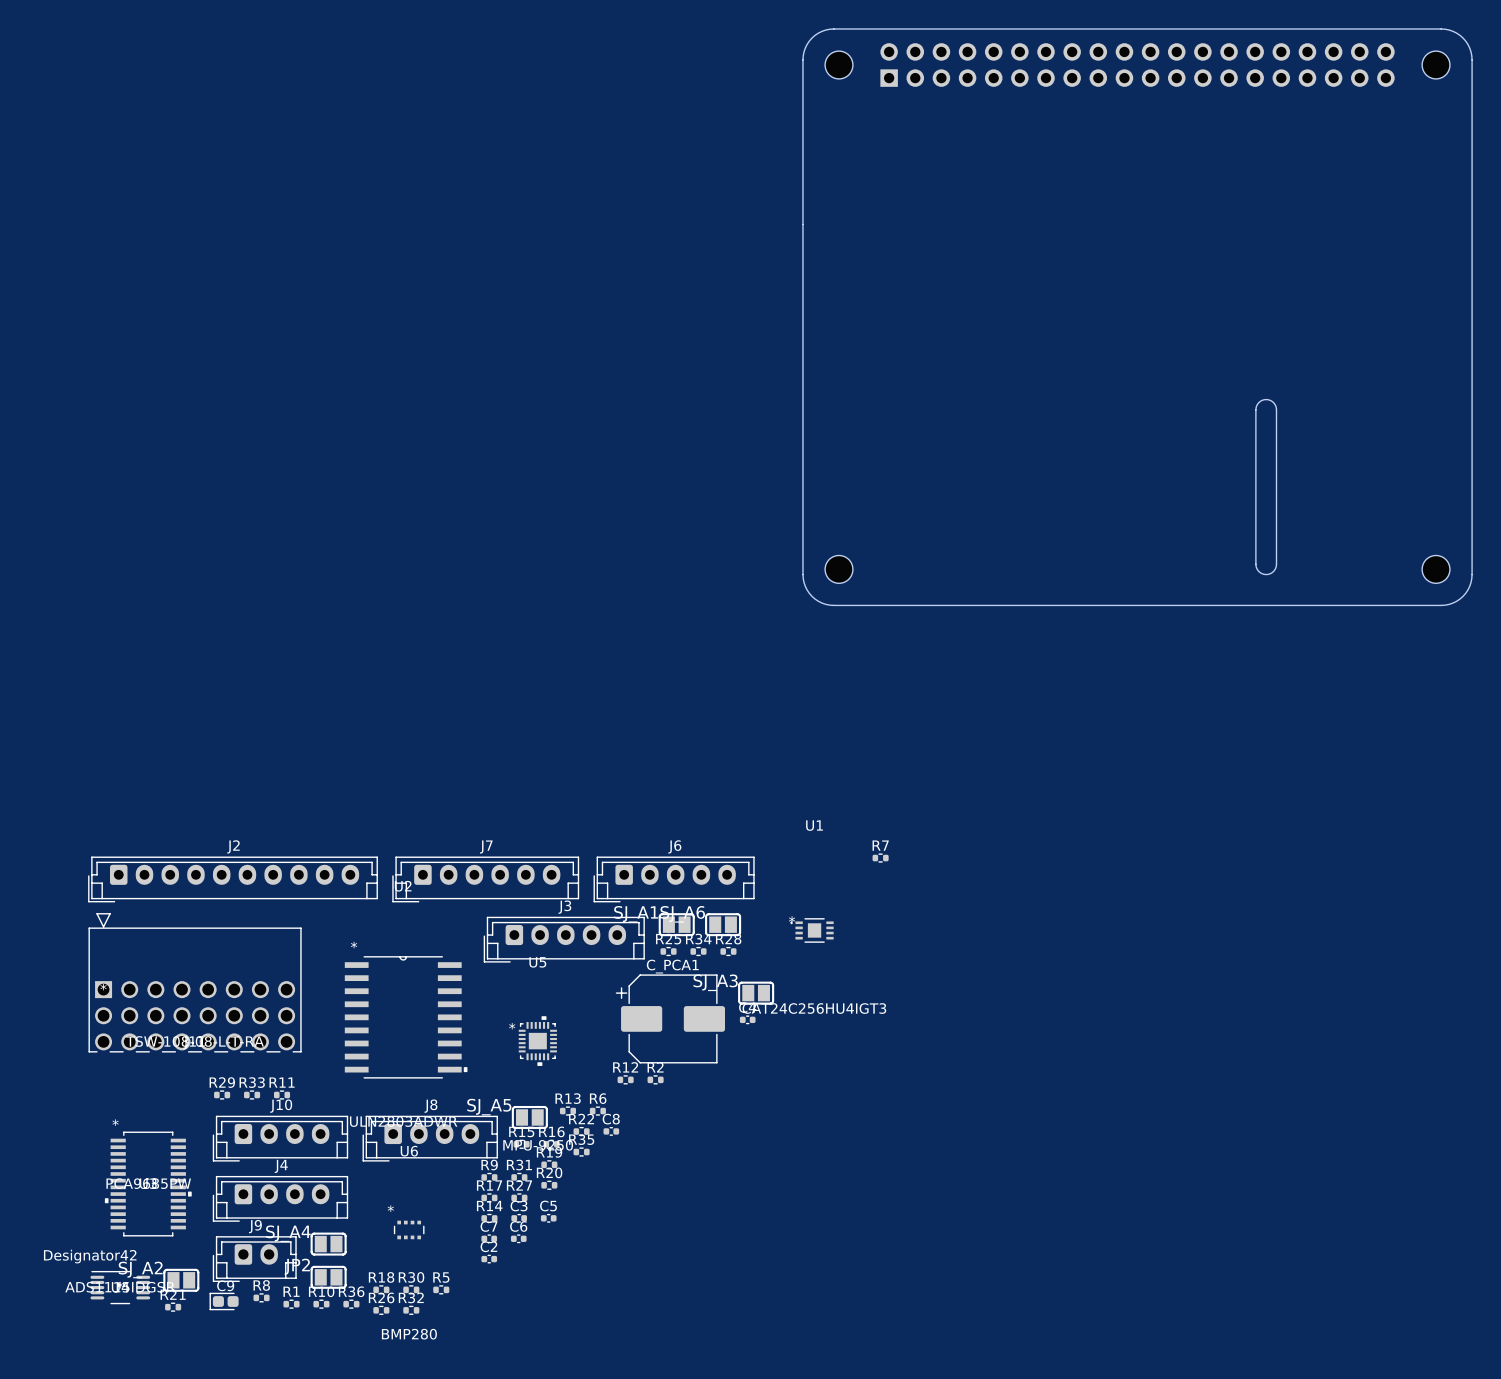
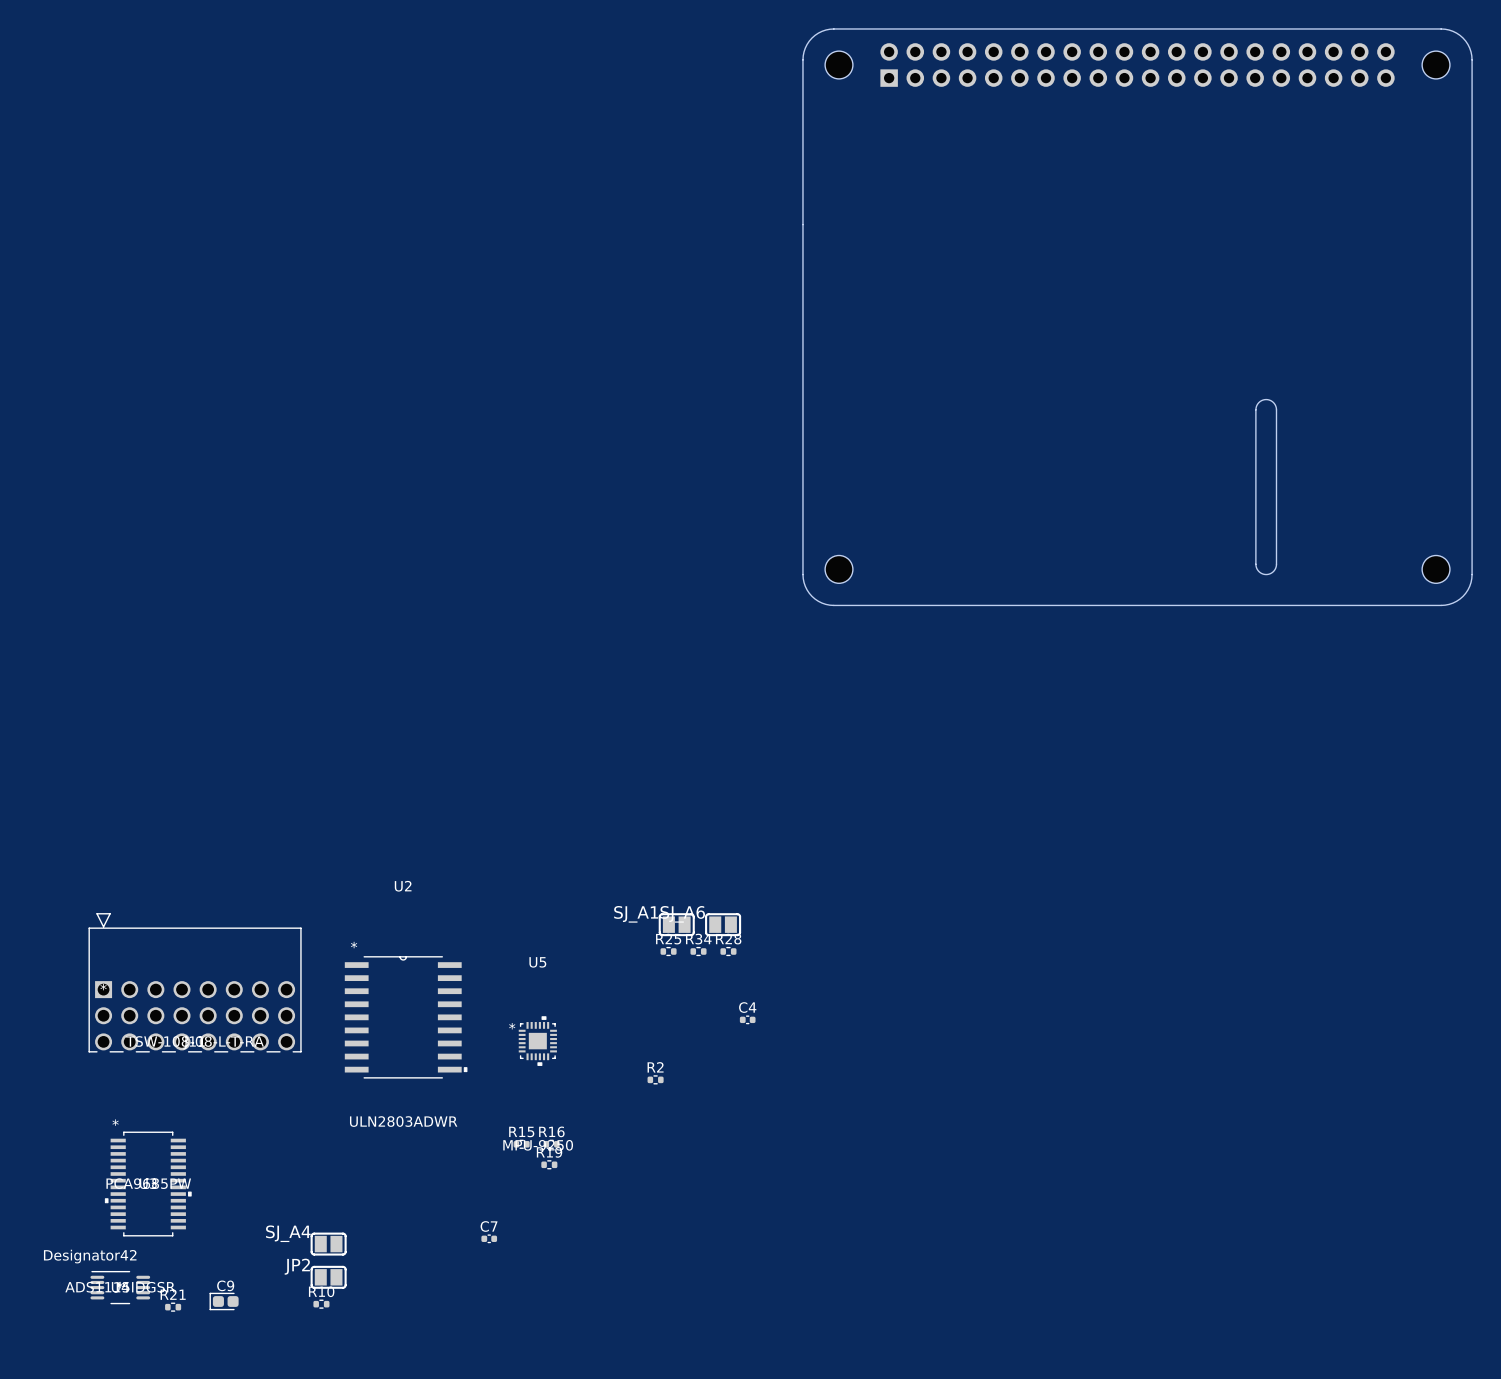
R7: (880, 858) -> none
J2: (233, 879) -> none
J7: (485, 879) -> none
J6: (674, 879) -> none
U1: CAT24C256HU4IGT3 (812, 930) -> none
J3: (564, 939) -> none
SJ_A3: (756, 993) -> none
C_PCA1: (670, 1018) -> none
R12: (625, 1079) -> none
R29: (222, 1095) -> none
R33: (252, 1095) -> none
R11: (282, 1095) -> none
R13: (567, 1111) -> none
R6: (597, 1111) -> none
SJ_A5: (529, 1117) -> none
R22: (581, 1131) -> none
C8: (611, 1131) -> none
J10: (280, 1138) -> none
J8: (430, 1138) -> none
R35: (581, 1152) -> none
R9: (489, 1177) -> none
R31: (519, 1177) -> none
R20: (549, 1185) -> none
R17: (489, 1197) -> none
R27: (519, 1197) -> none
J4: (280, 1198) -> none
R14: (489, 1218) -> none
C3: (519, 1218) -> none
C5: (548, 1218) -> none
U6: BMP280 (409, 1229) -> none
C6: (518, 1238) -> none
J9: (254, 1259) -> none
C2: (489, 1259) -> none
SJ_A2: (181, 1280) -> none
R18: (381, 1289) -> none
R30: (411, 1289) -> none
R5: (441, 1289) -> none
R8: (261, 1297) -> none
R1: (291, 1304) -> none
R36: (351, 1304) -> none
R26: (381, 1310) -> none
R32: (411, 1310) -> none

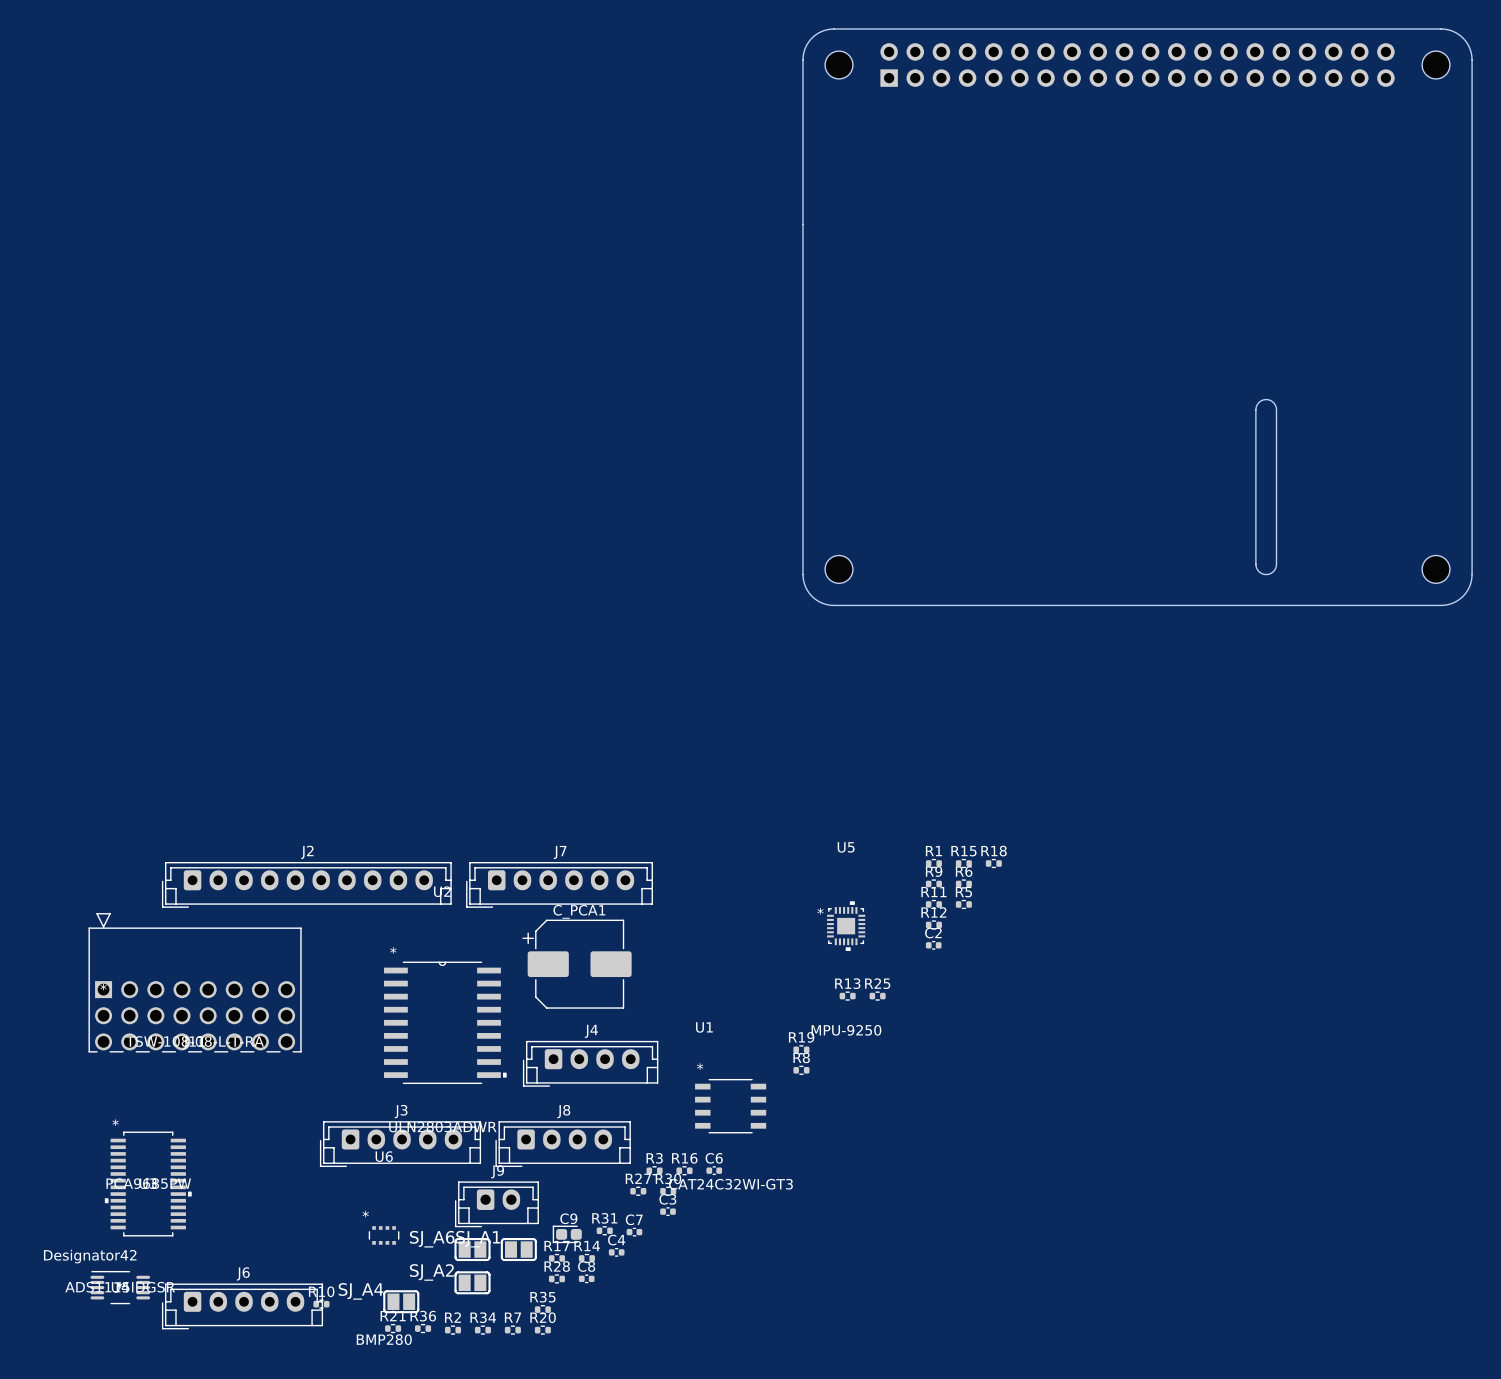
R1: none -> (933, 863)
R18: none -> (993, 863)
R9: none -> (933, 883)
R6: none -> (963, 883)
J2: none -> (306, 884)
J7: none -> (559, 884)
R11: none -> (933, 904)
R5: none -> (963, 904)
SJ_A1 position: (676, 924) -> (518, 1249)
SJ_A6 position: (723, 924) -> (472, 1249)
R12: none -> (933, 924)
C2: none -> (933, 945)
R25 position: (668, 951) -> (877, 996)
R34 position: (698, 951) -> (482, 1330)
R28 position: (728, 951) -> (556, 1278)
C_PCA1: none -> (577, 964)
R13: none -> (847, 996)
U2 position: (406, 1017) -> (445, 1022)
C4 position: (747, 1019) -> (616, 1252)
U5 position: (537, 1041) -> (846, 926)
J4: none -> (590, 1063)
R8: none -> (801, 1070)
R2 position: (655, 1079) -> (452, 1330)
U1: none -> CAT24C32WI-GT3 (730, 1106)
J3: none -> (400, 1144)
R15 position: (521, 1144) -> (963, 863)
R16 position: (551, 1144) -> (684, 1170)
J8: none -> (563, 1144)
R19 position: (549, 1164) -> (801, 1049)
R3: none -> (654, 1170)
C6: none -> (714, 1170)
R27: none -> (638, 1191)
R30: none -> (668, 1191)
J9: none -> (496, 1204)
C3: none -> (668, 1211)
R31: none -> (604, 1230)
U6: none -> BMP280 (384, 1235)
C7 position: (489, 1238) -> (634, 1232)
SJ_A4 position: (328, 1244) -> (401, 1301)
R17: none -> (556, 1258)
R14: none -> (586, 1258)
JP2: (328, 1277) -> none
C8: none -> (586, 1278)
SJ_A2: none -> (472, 1282)
C9 position: (224, 1301) -> (567, 1234)
J6: none -> (242, 1306)
R21 position: (173, 1307) -> (393, 1328)
R35: none -> (542, 1309)
R36: none -> (423, 1328)
R7: none -> (512, 1330)
R20: none -> (542, 1330)

